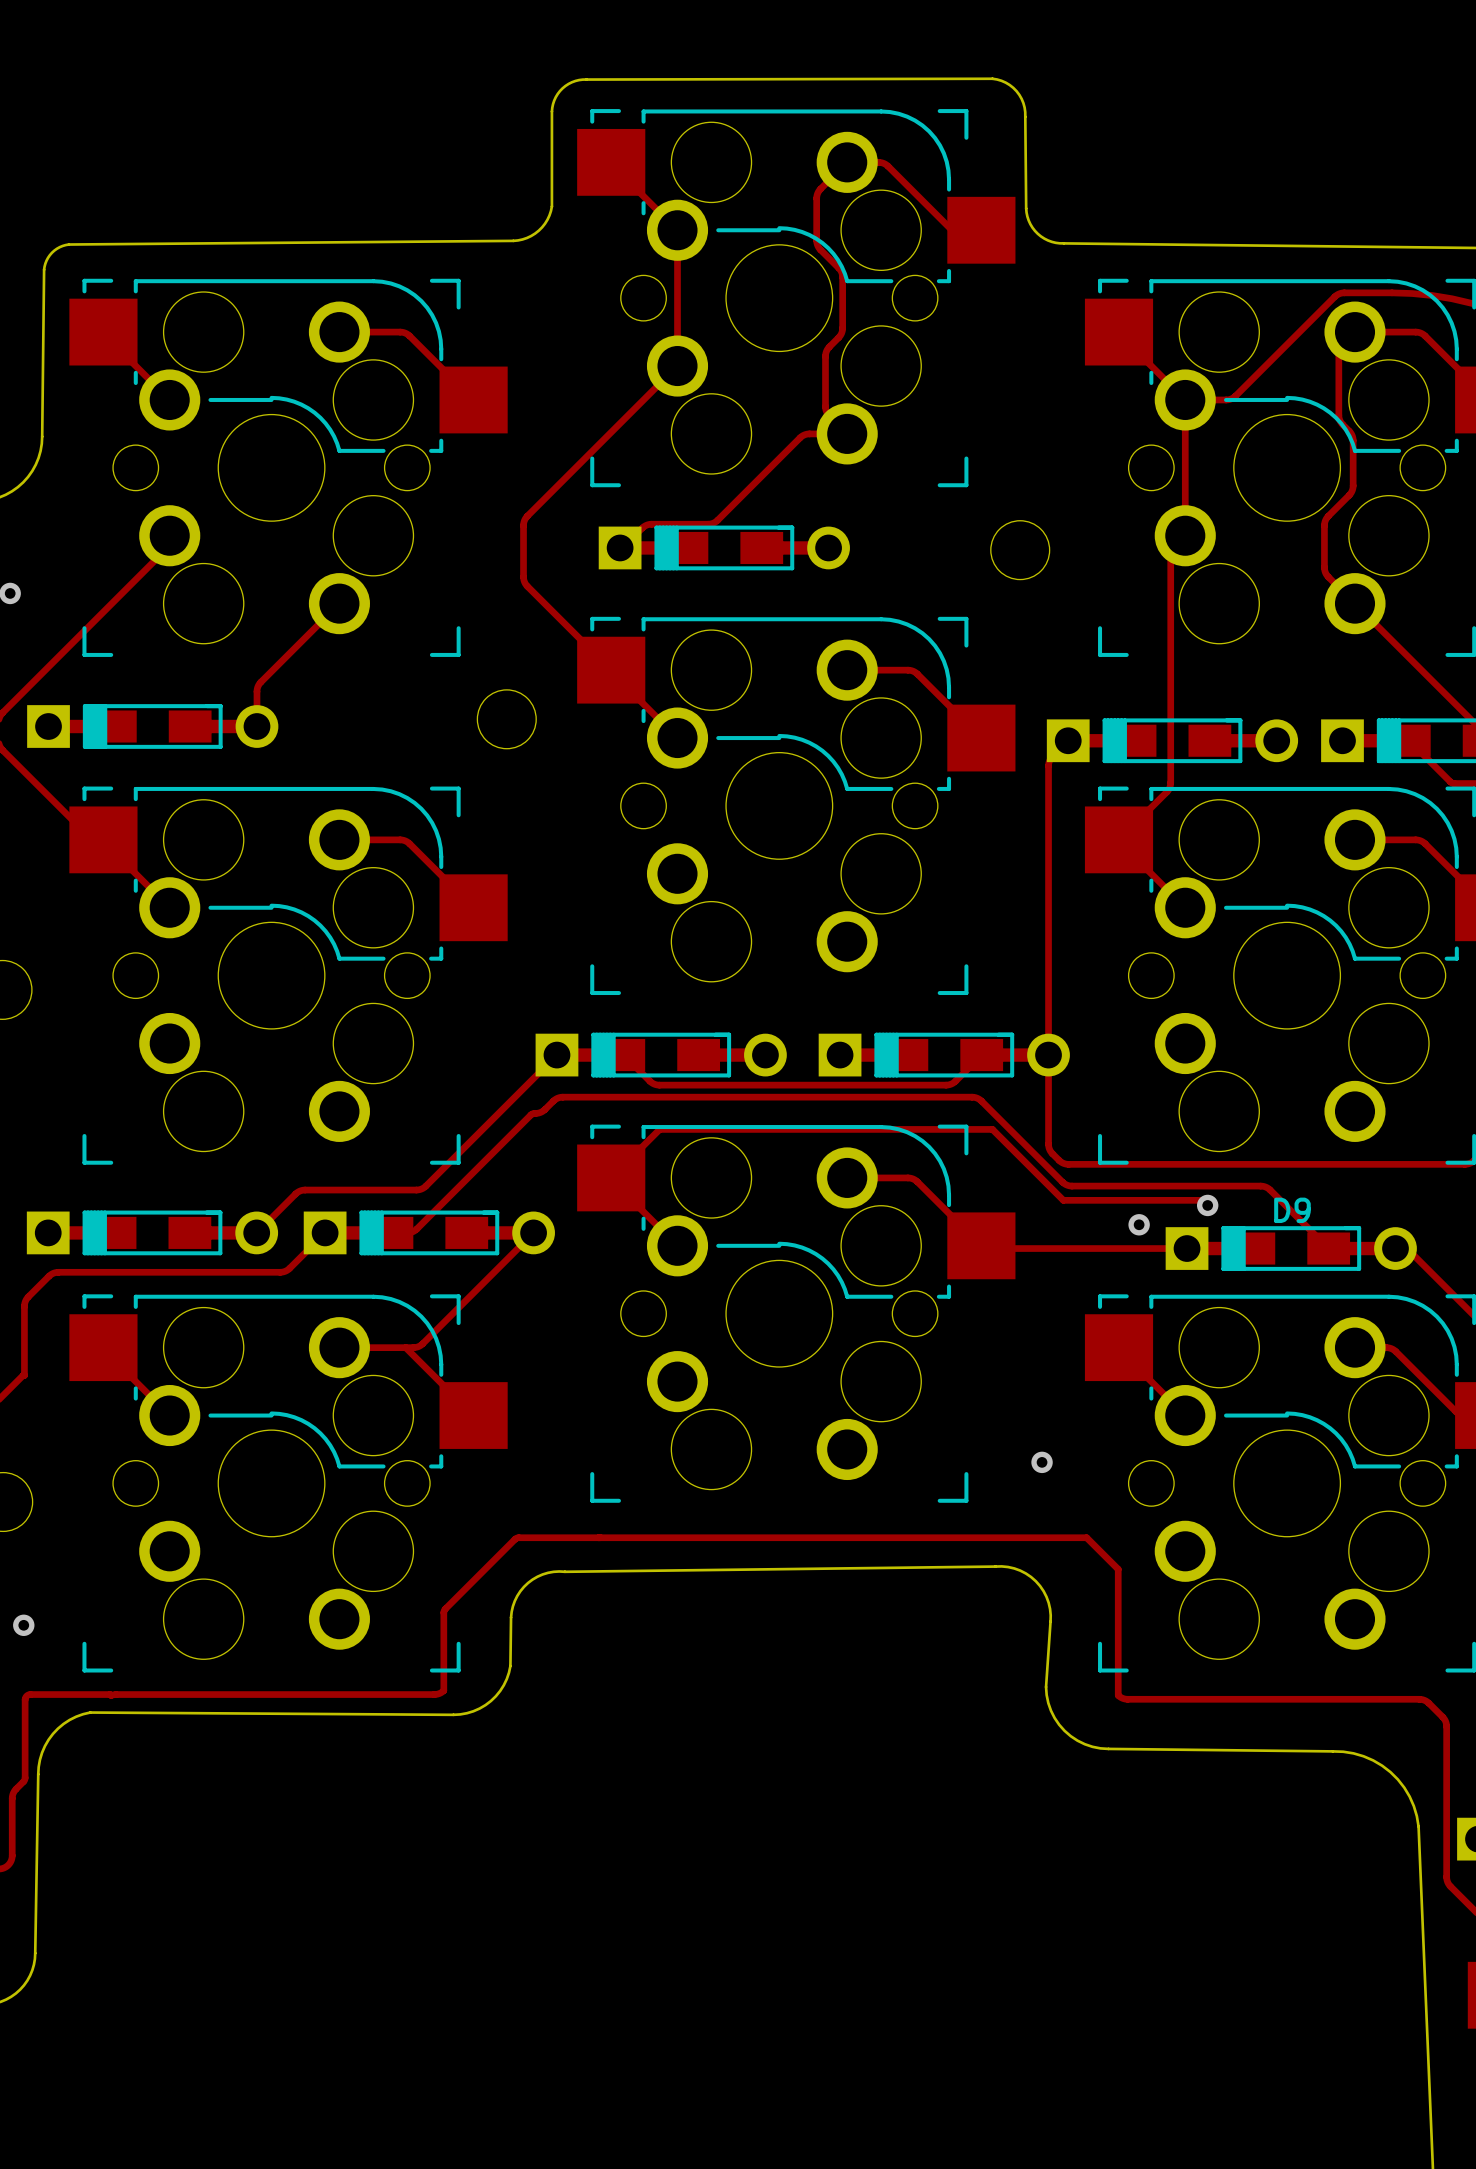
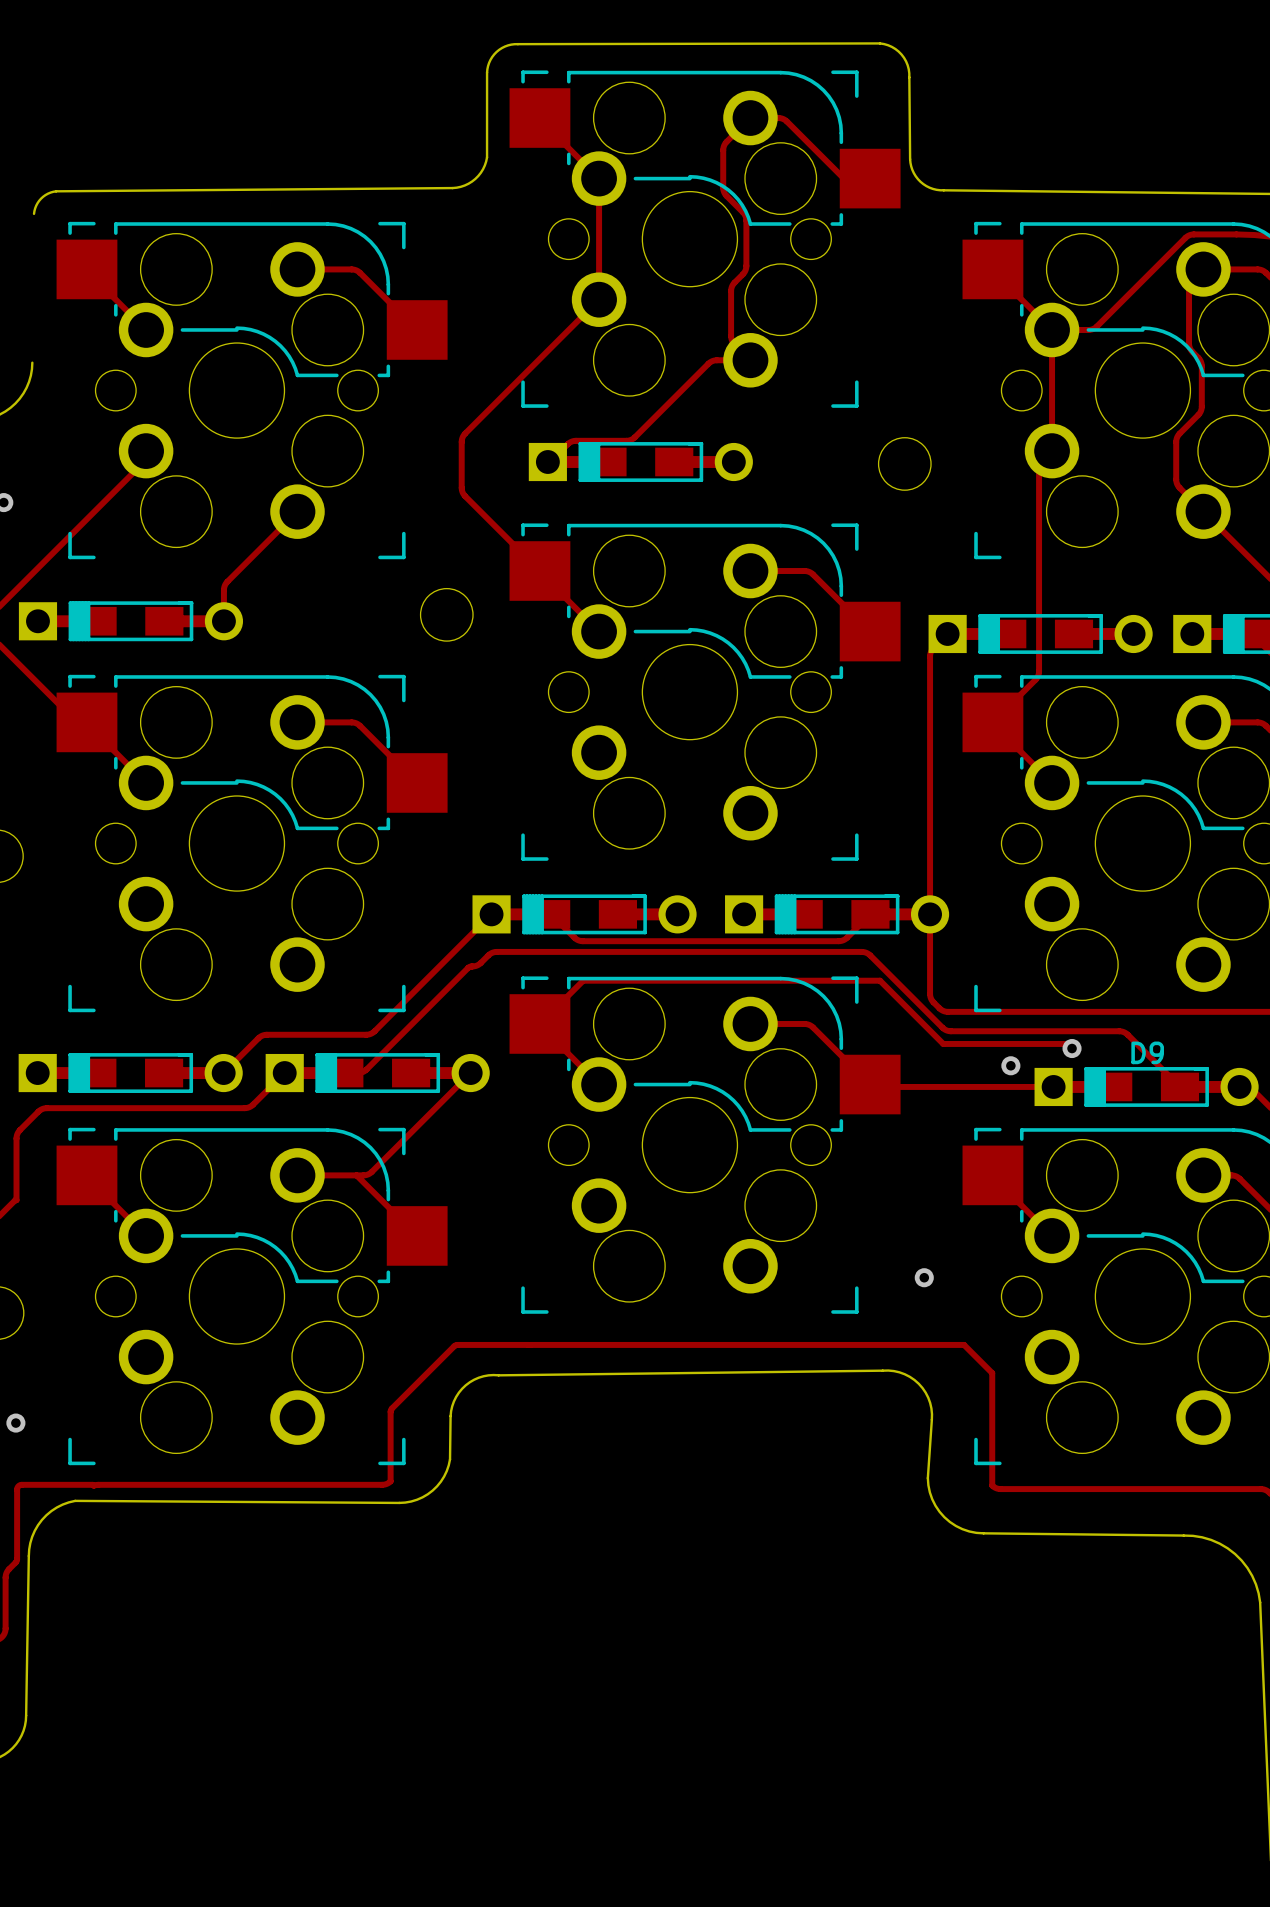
board edge: (44, 269) (42, 436) -> none

